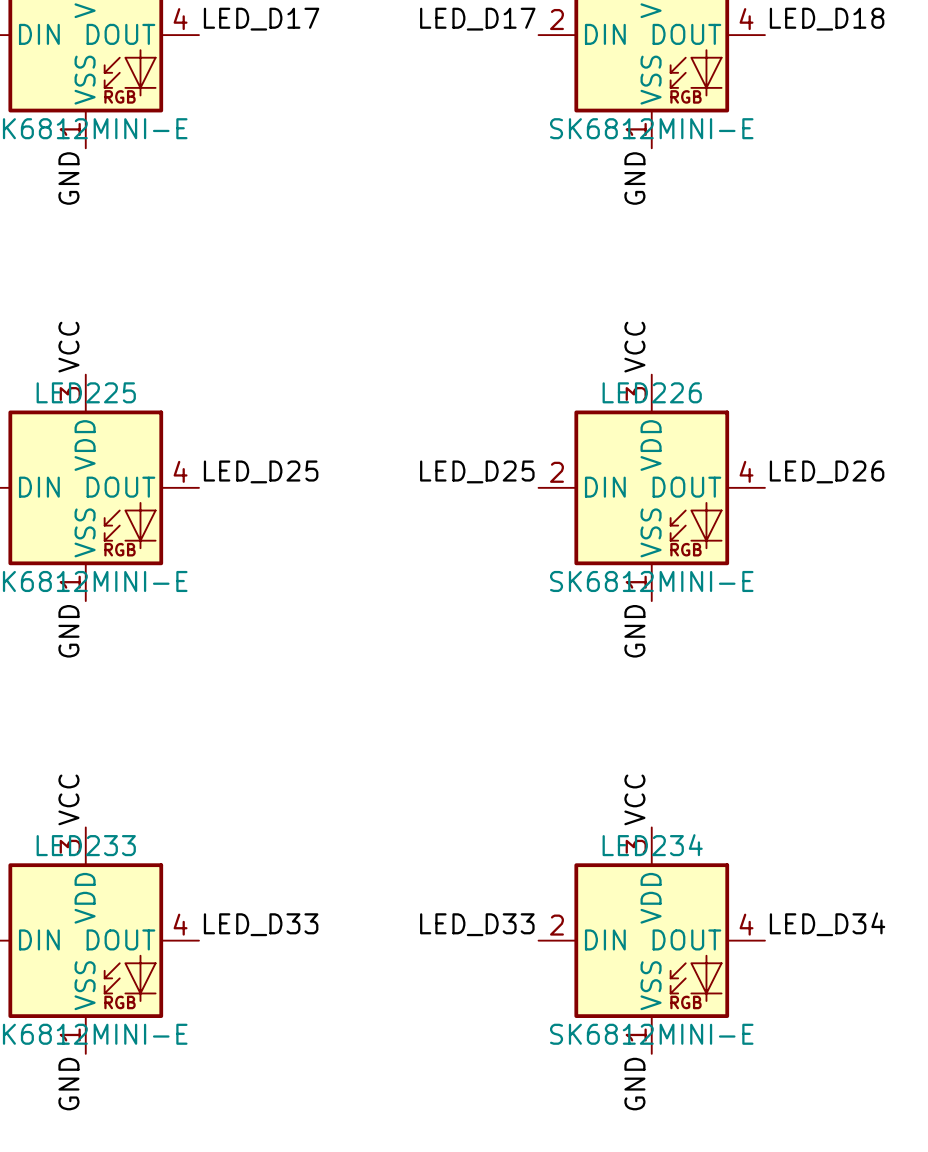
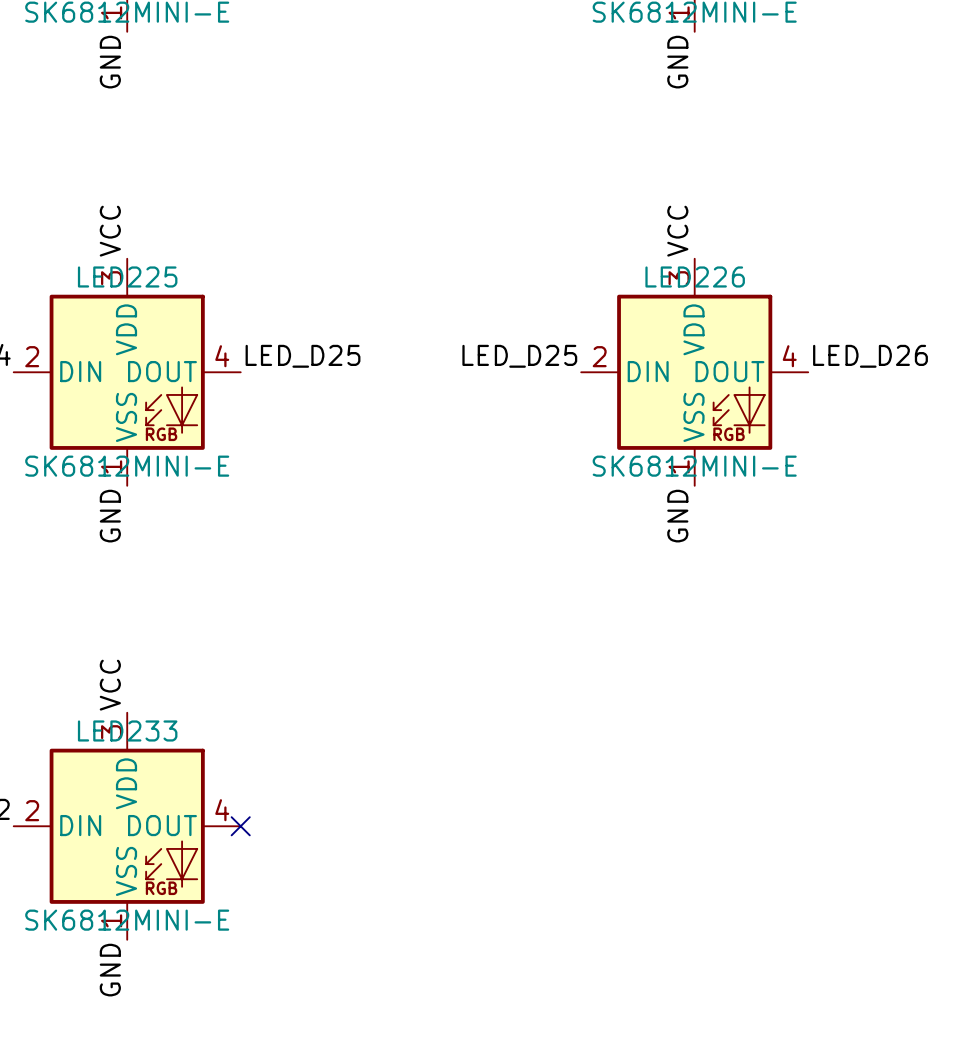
label: VCC (634, 799) -> none
label: LED_D33 (261, 924) -> none
label: LED_D33 (477, 924) -> none
label: LED_D34 (827, 924) -> none
no-connect mark: none -> (240, 826)
LED234: SK6812MINI-E (651, 940) -> none
label: GND (634, 1084) -> none

